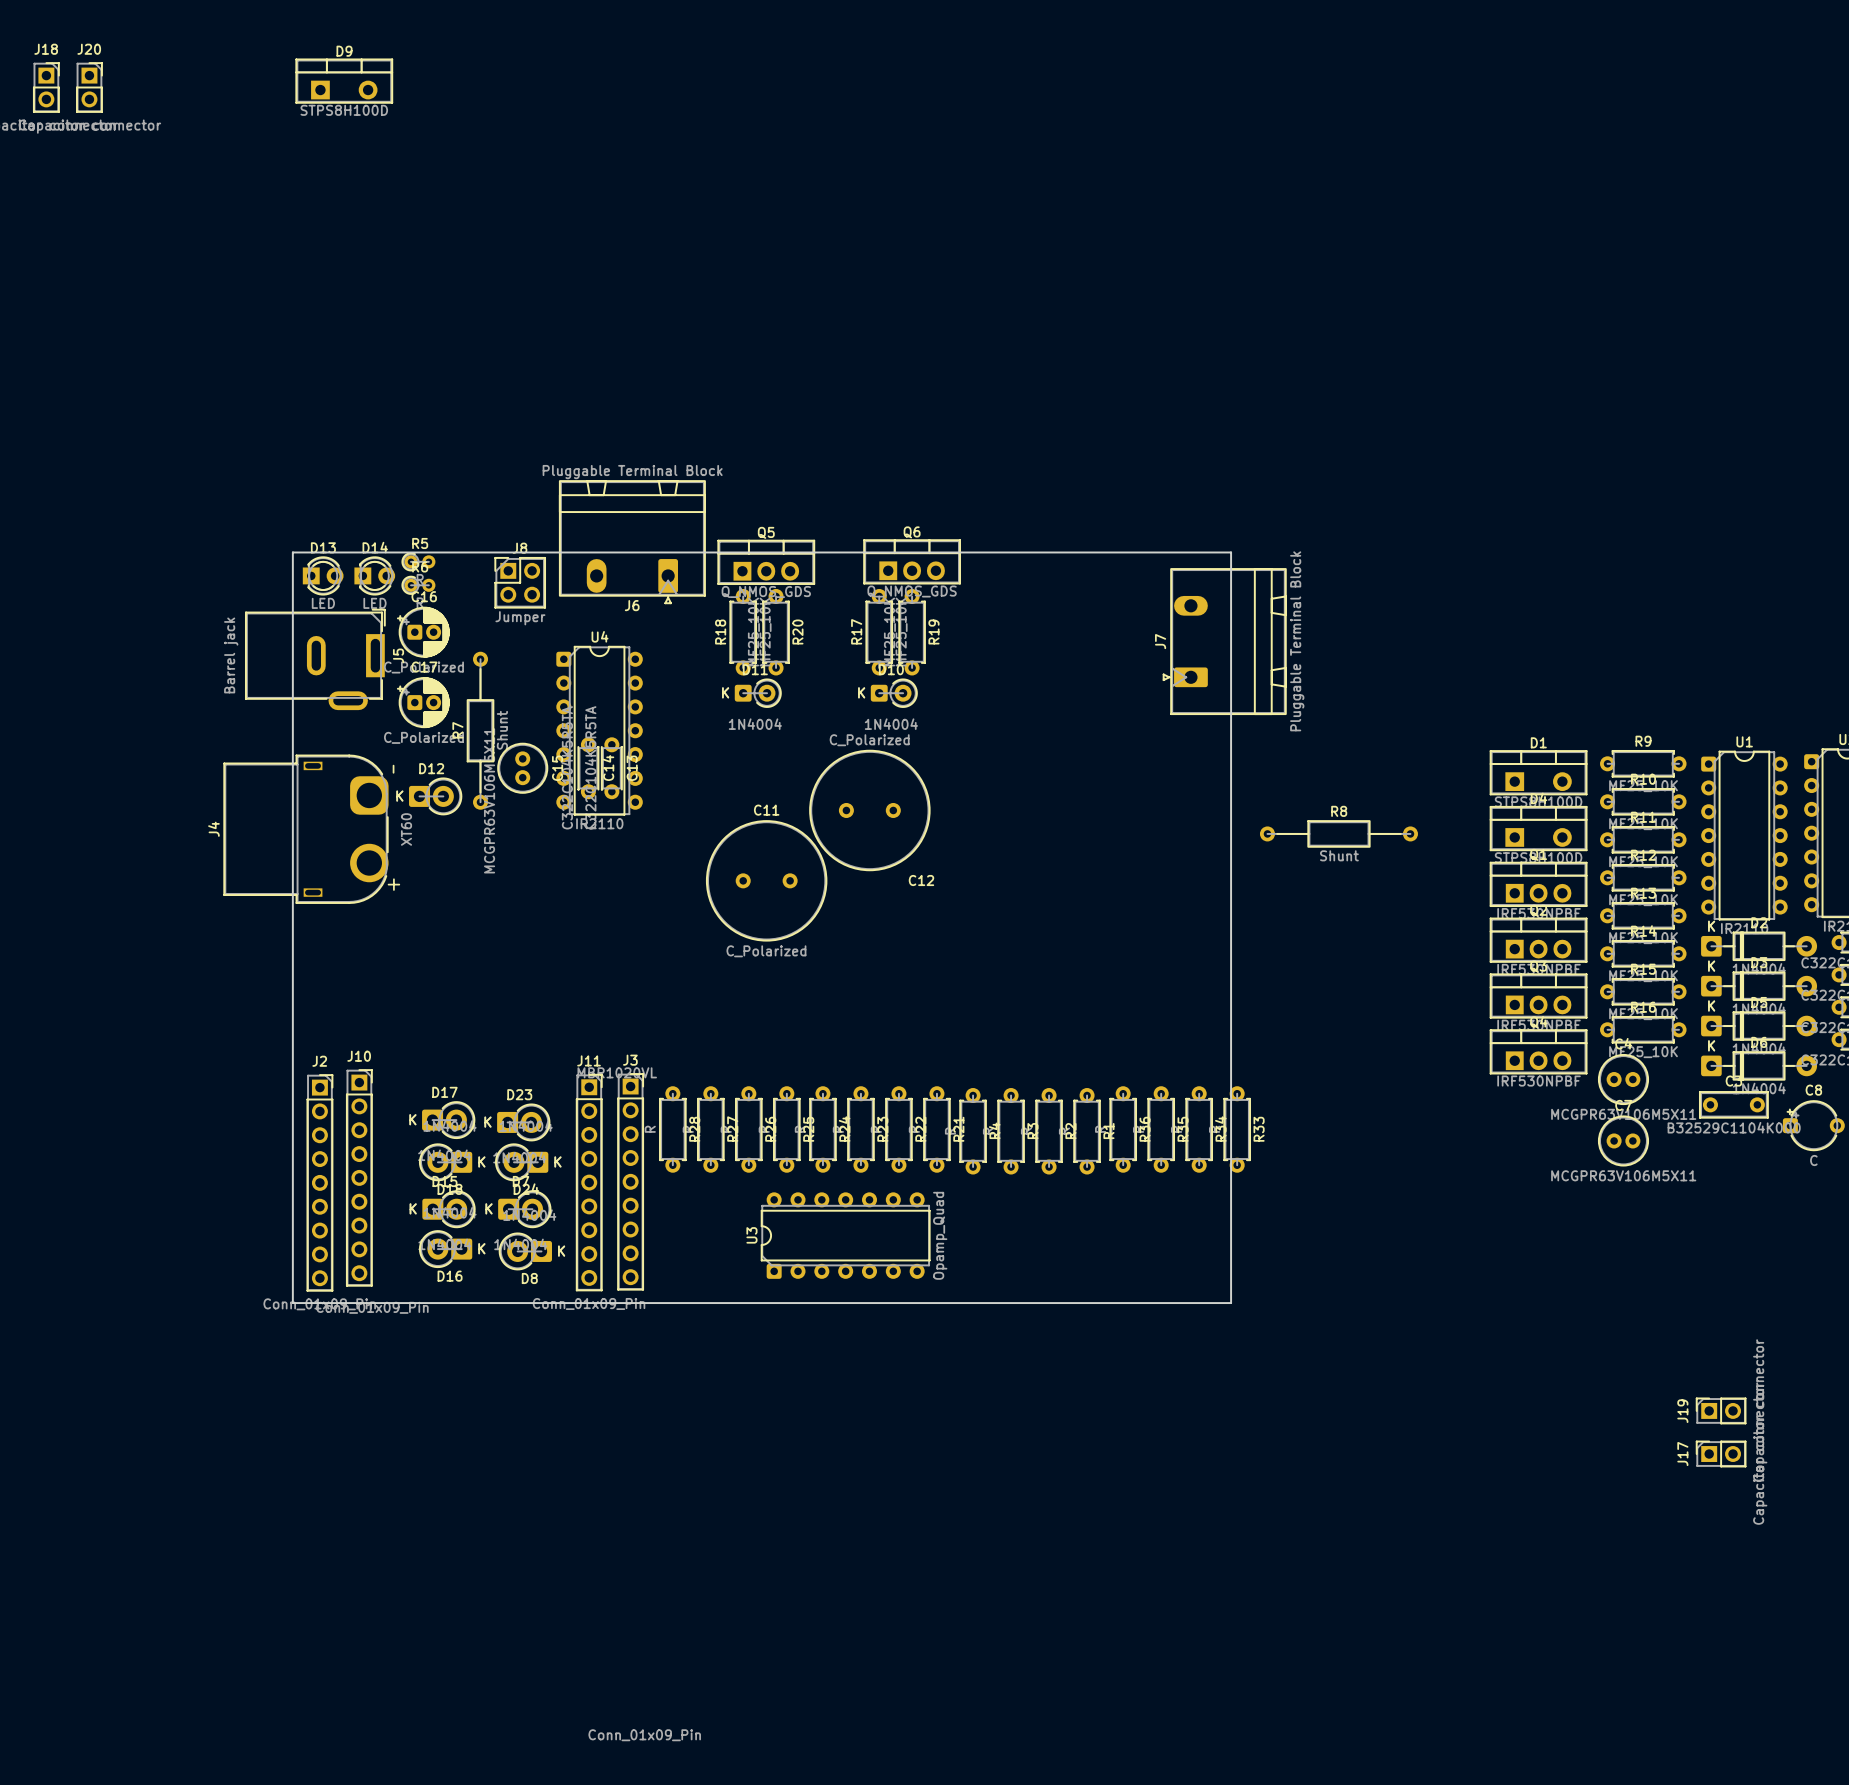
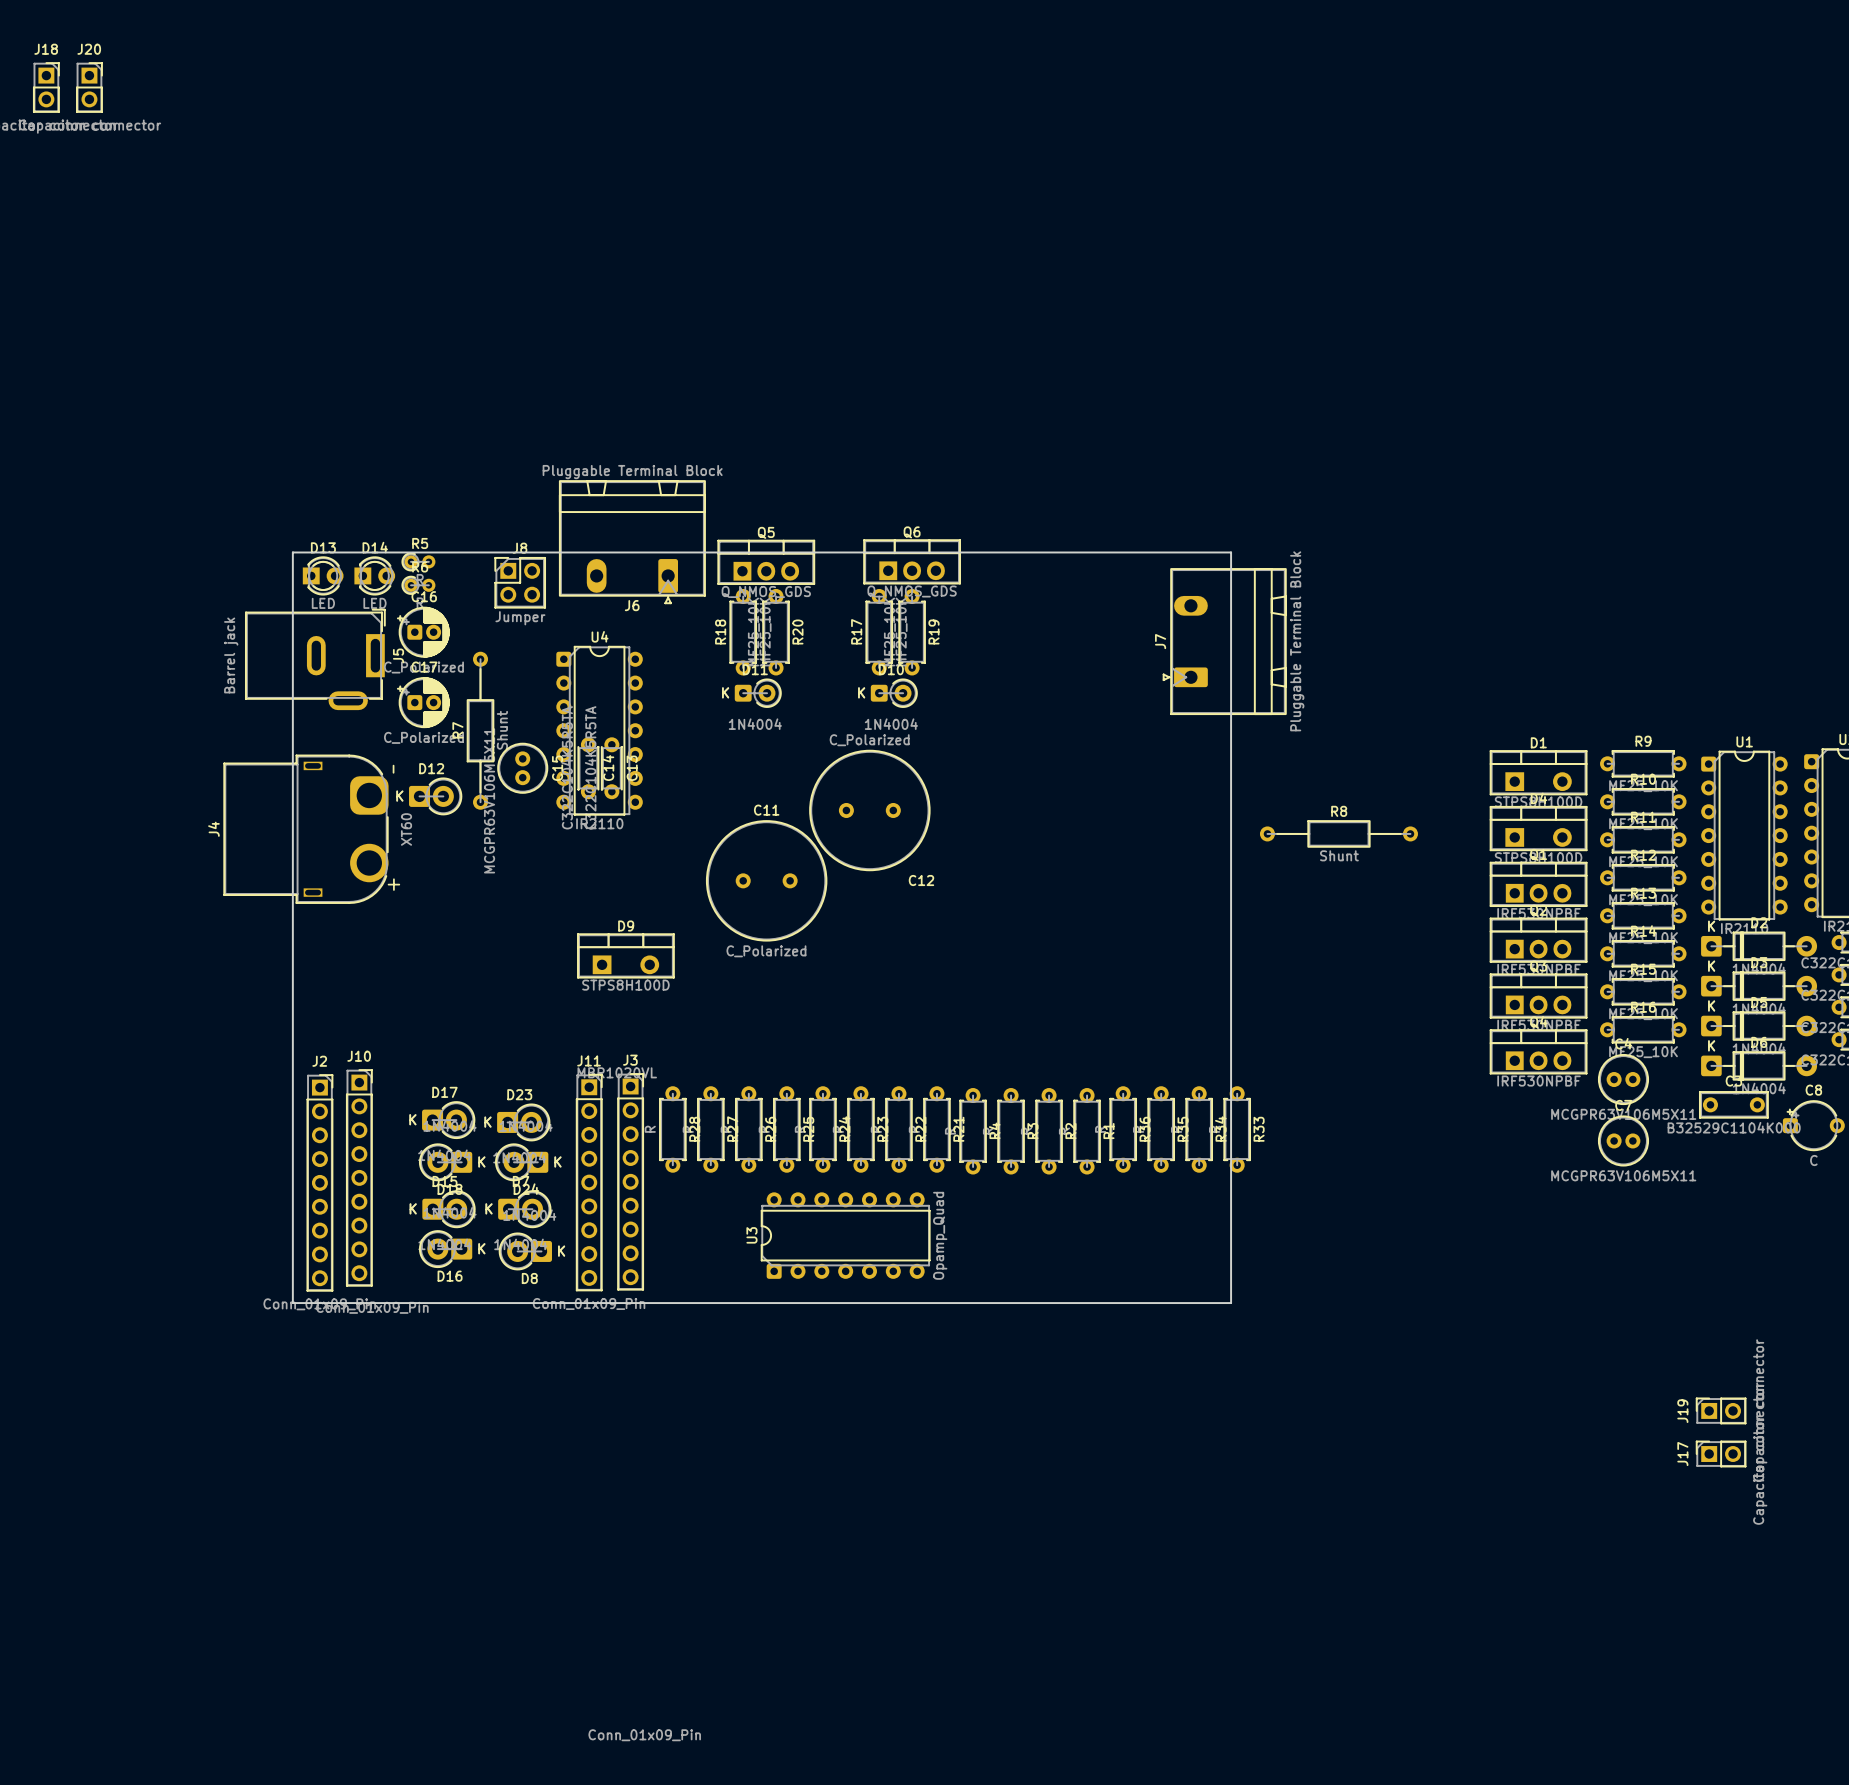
D9 position: (344, 81) -> (625, 955)

